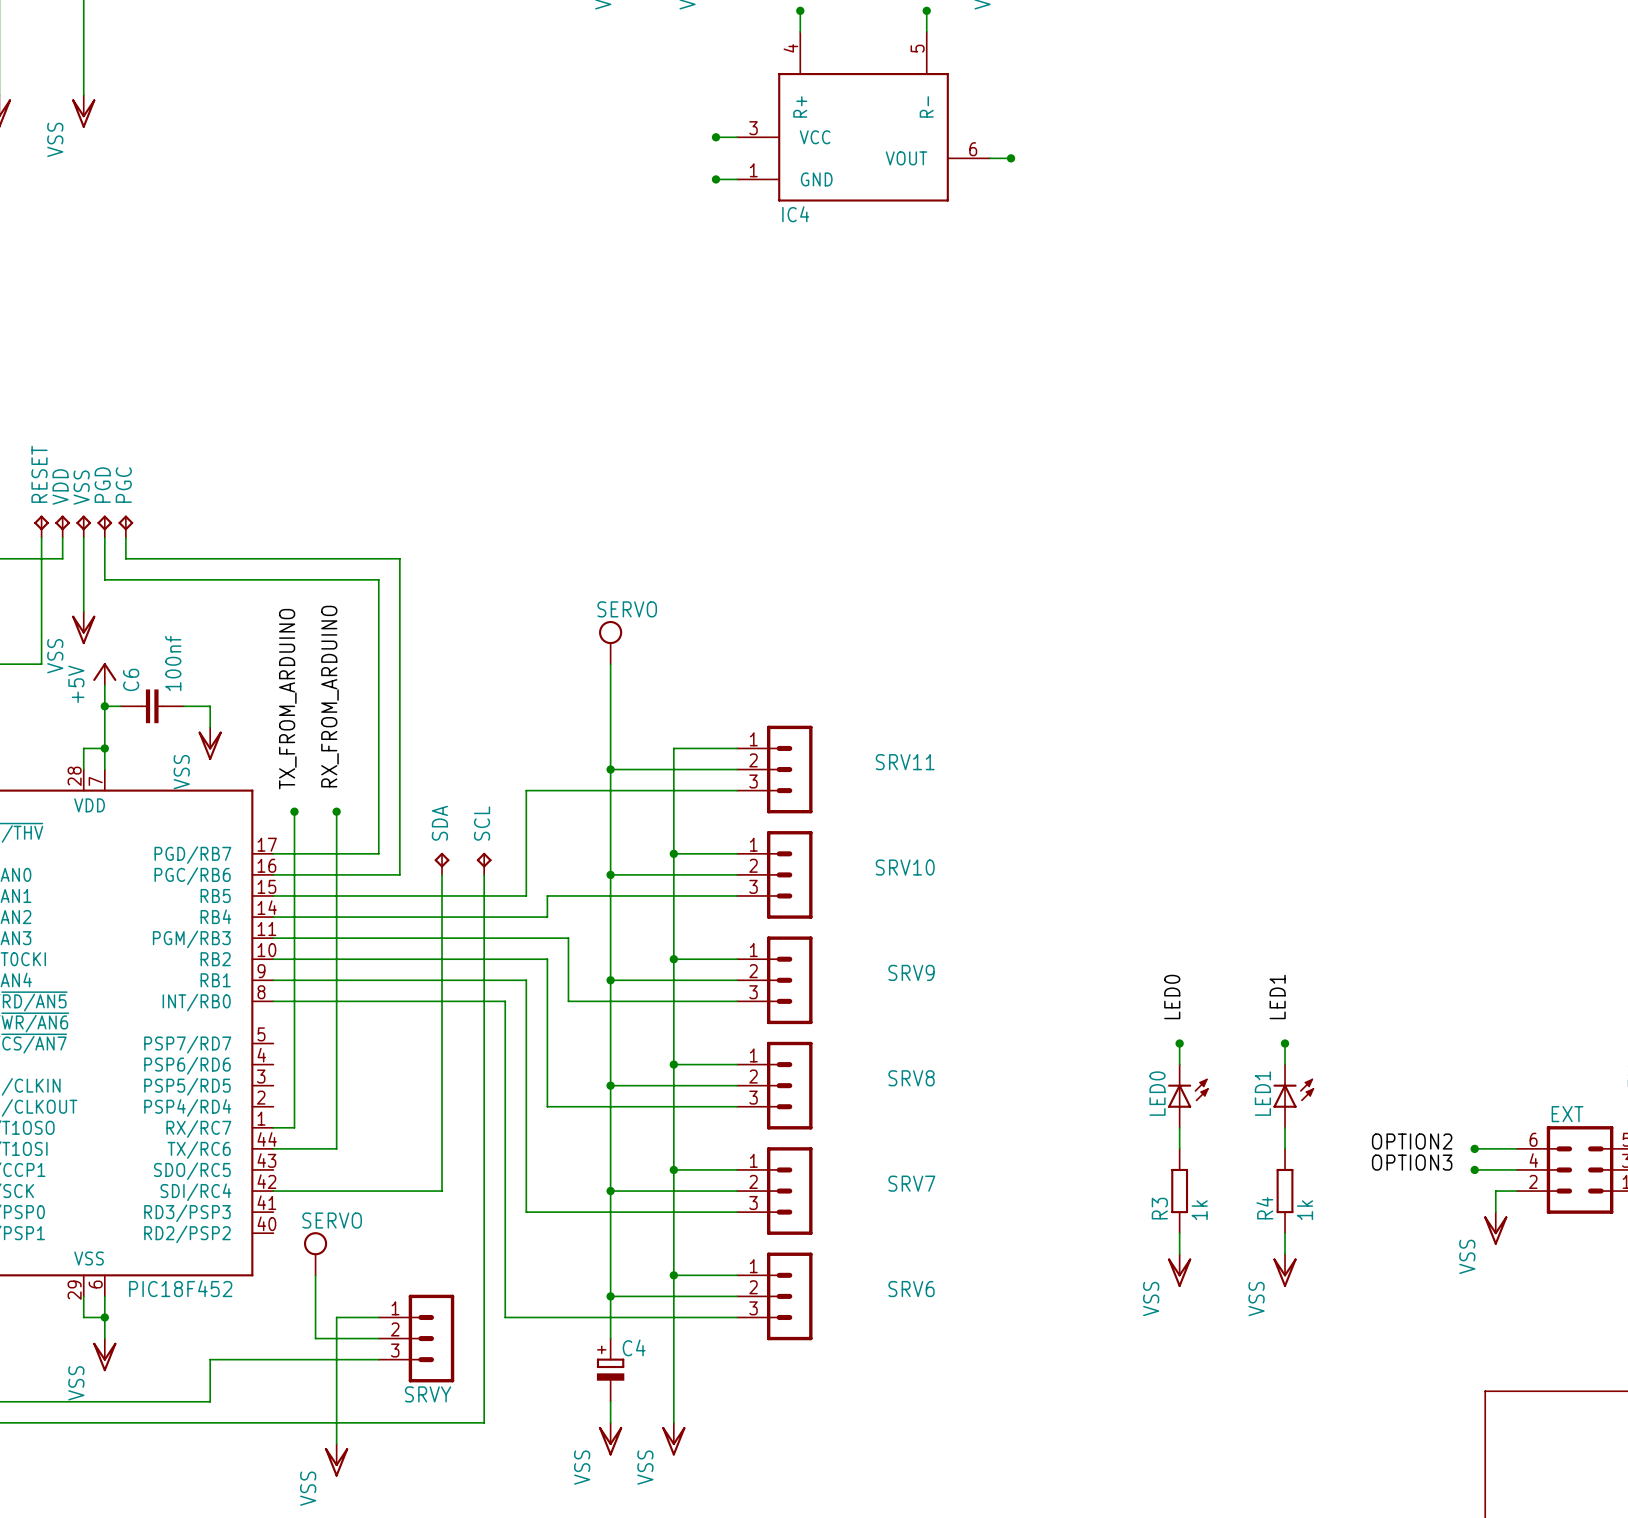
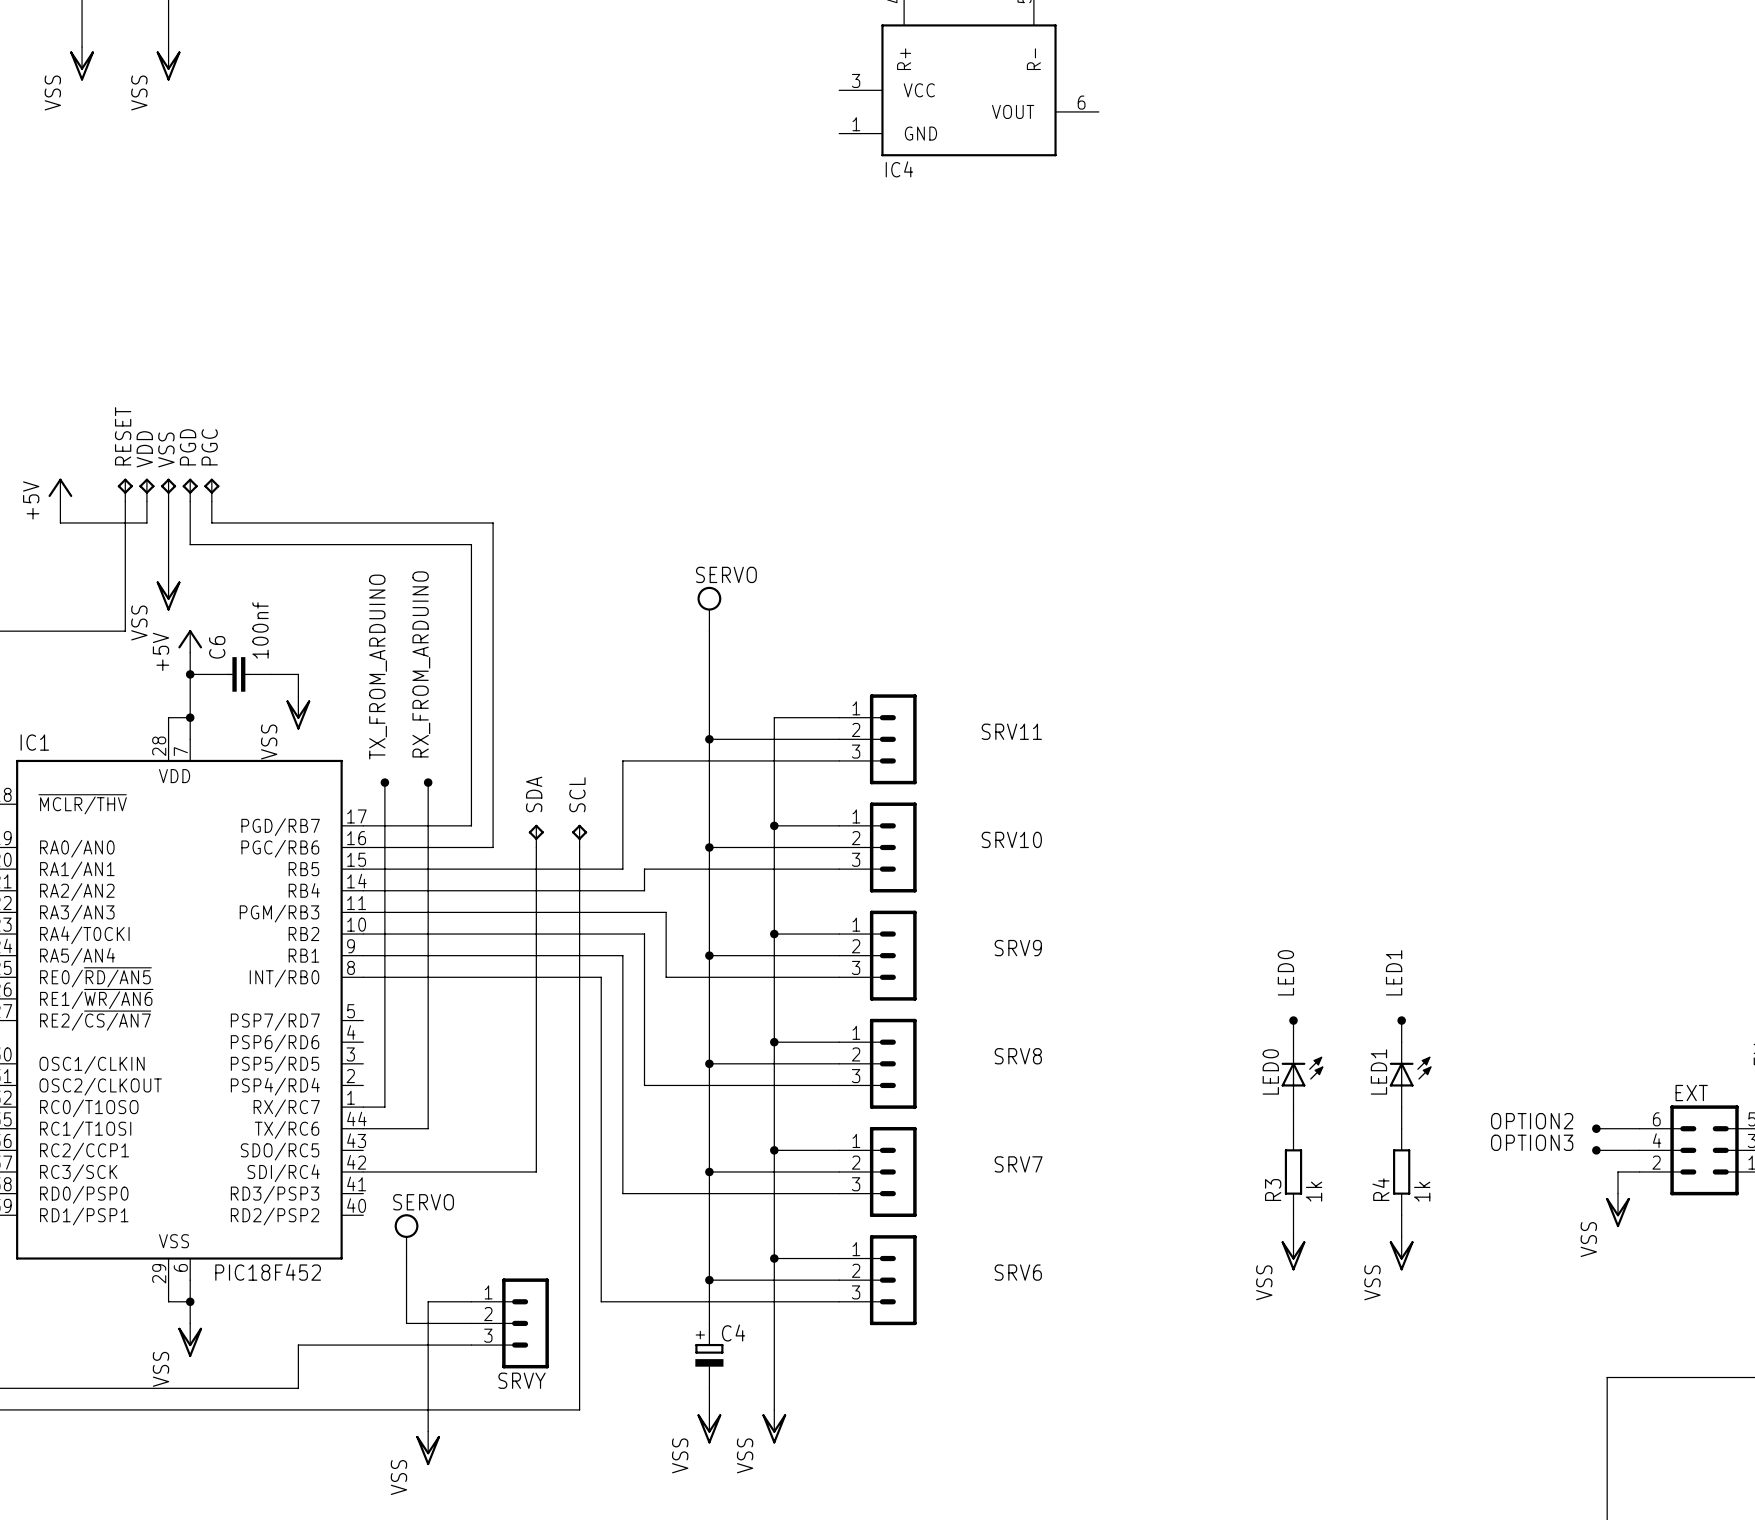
wire: (715, 137) (737, 137) -> none
junction: (715, 137) -> none
wire: (989, 158) (1011, 158) -> none
junction: (1011, 158) -> none
wire: (715, 179) (737, 179) -> none
junction: (715, 179) -> none

